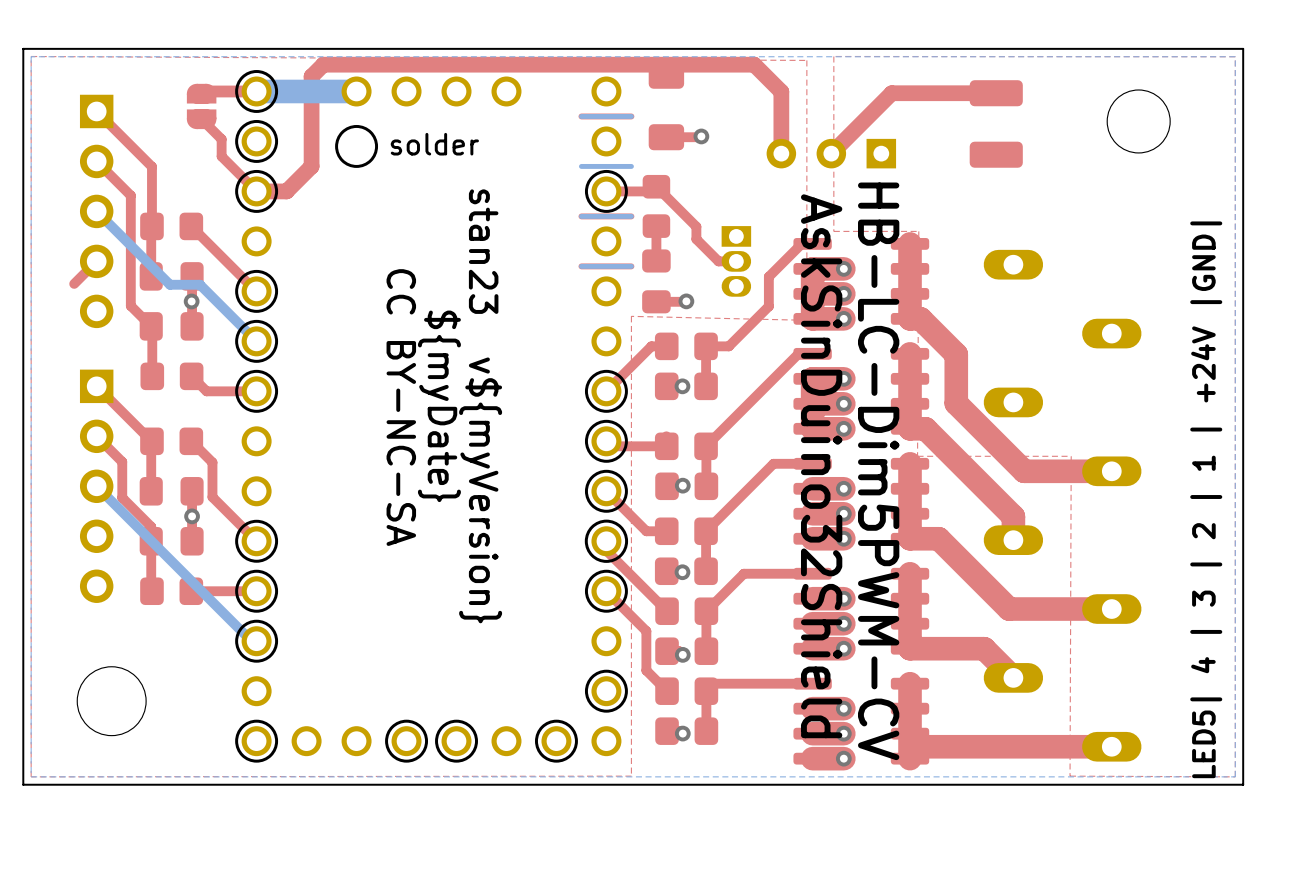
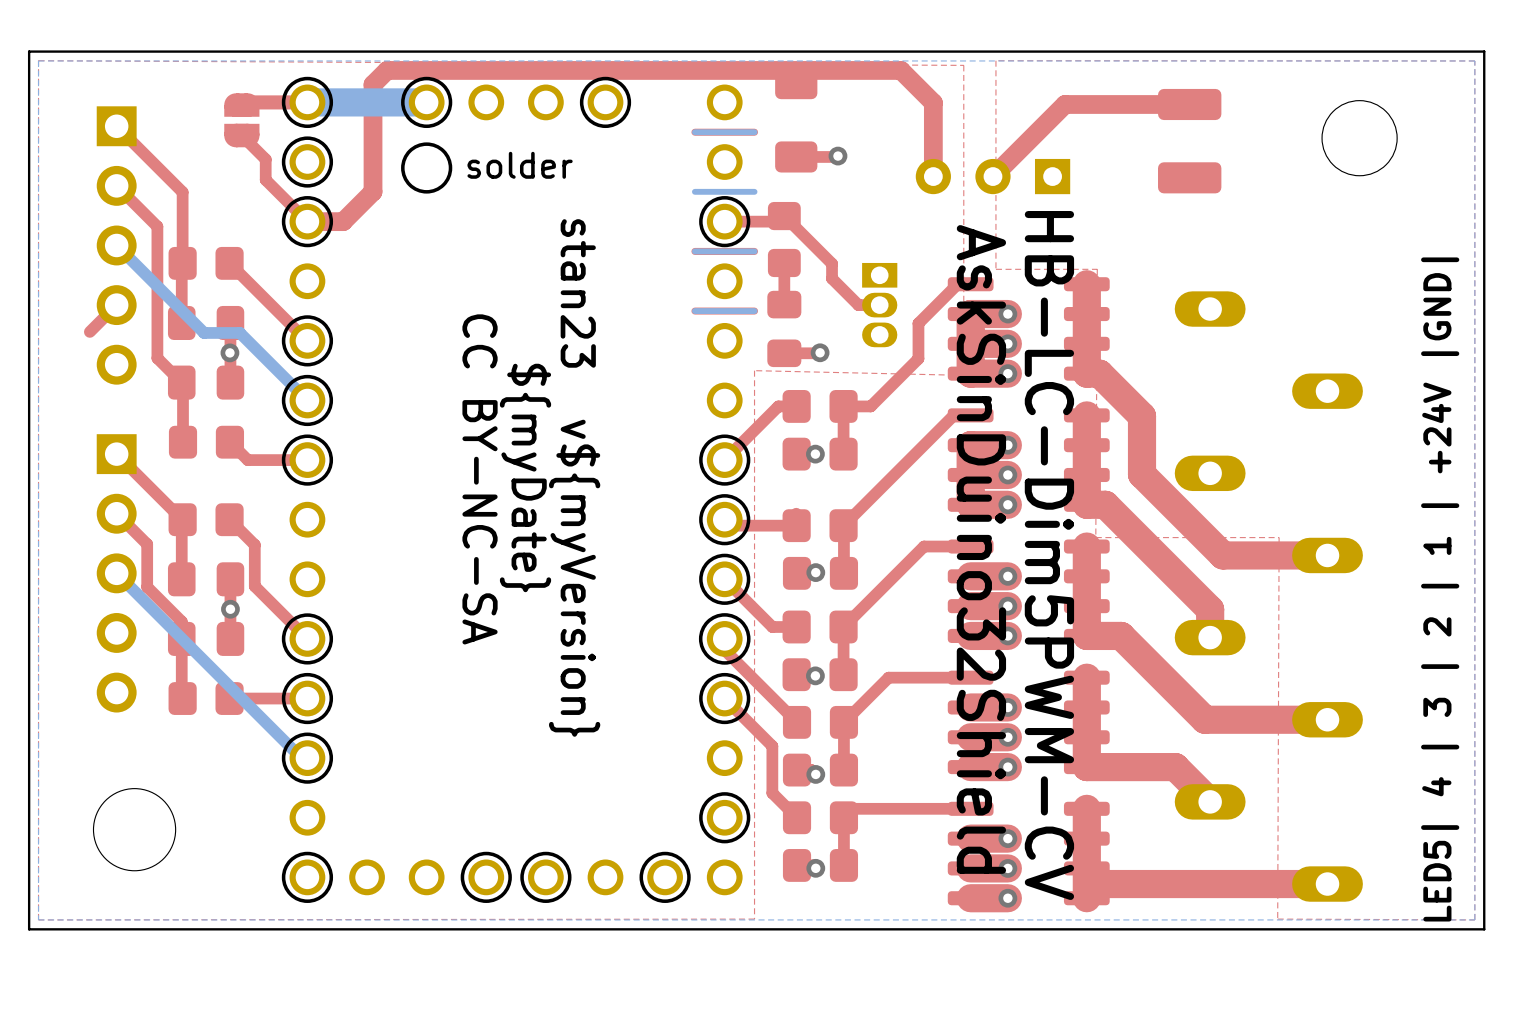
drawing: none -> [401, 76, 453, 129]
drawing: none -> [579, 76, 632, 129]

